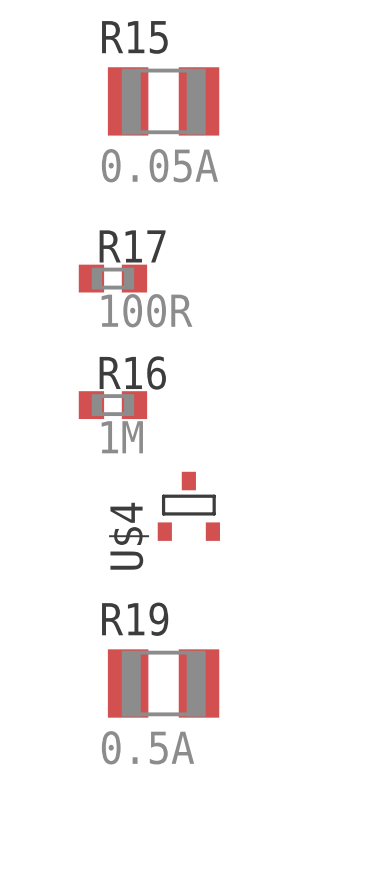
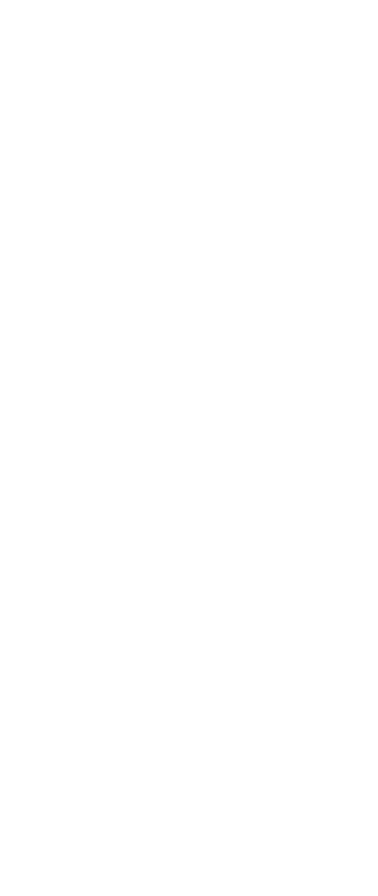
R15: 0.05A (163, 101) -> none
R17: 100R (112, 278) -> none
R16: 1M (112, 405) -> none
U$4: (188, 506) -> none
R19: 0.5A (163, 683) -> none

